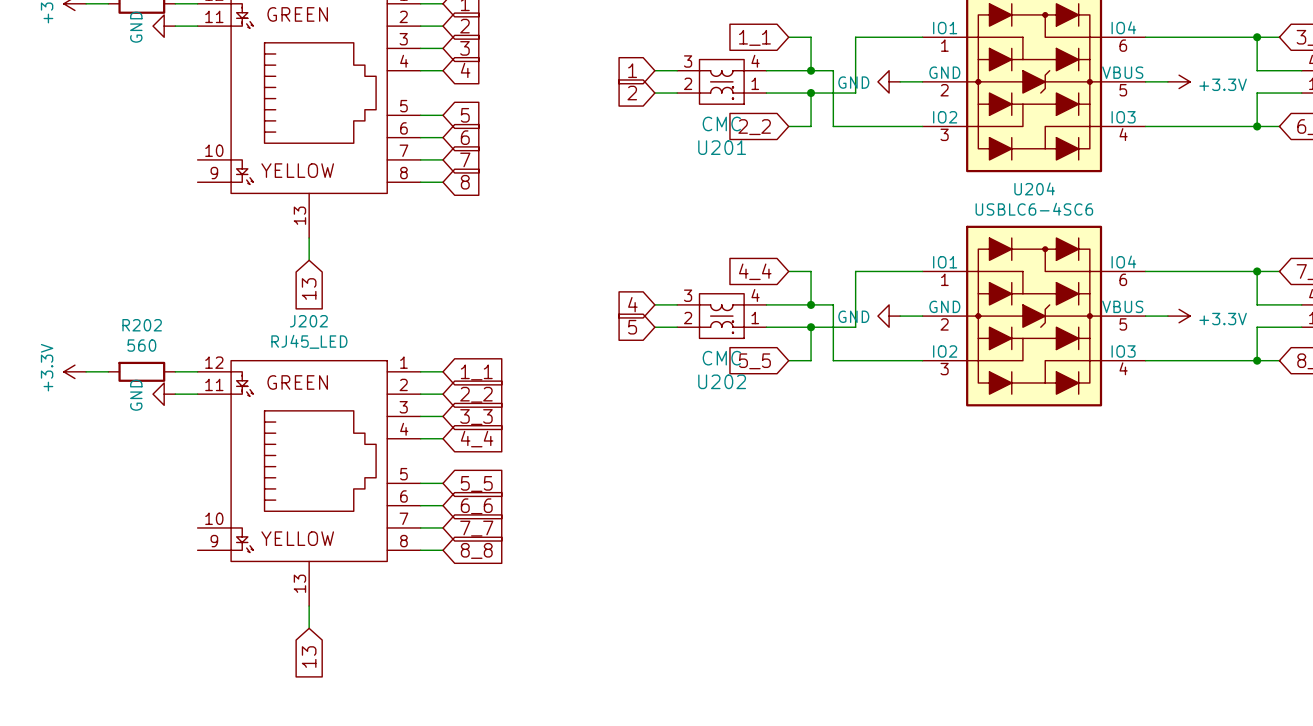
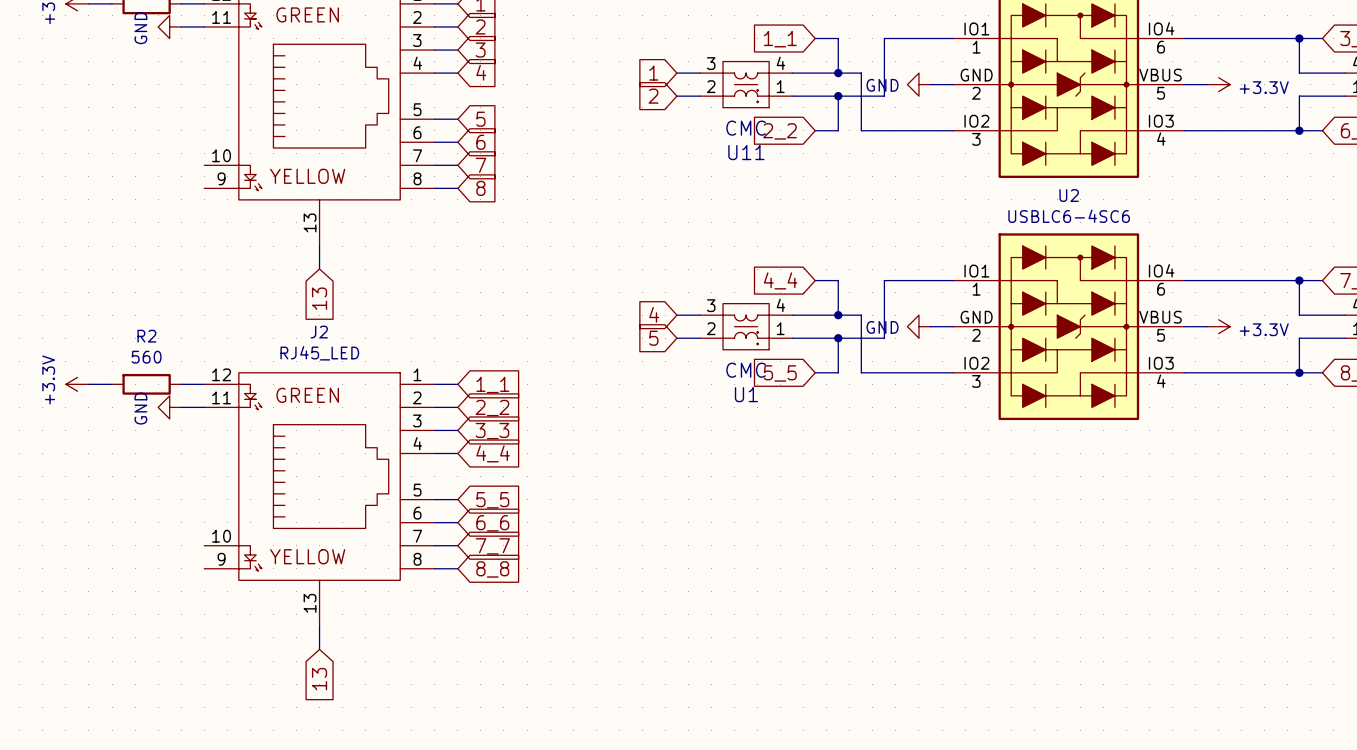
U201 name: U201 (722, 147) -> U11 (746, 152)
U204 name: U204 (1034, 188) -> U2 (1069, 195)
J202 name: J202 (308, 321) -> J2 (319, 332)
R202 name: R202 (142, 325) -> R2 (146, 336)
U202 name: U202 (722, 381) -> U1 (746, 394)

